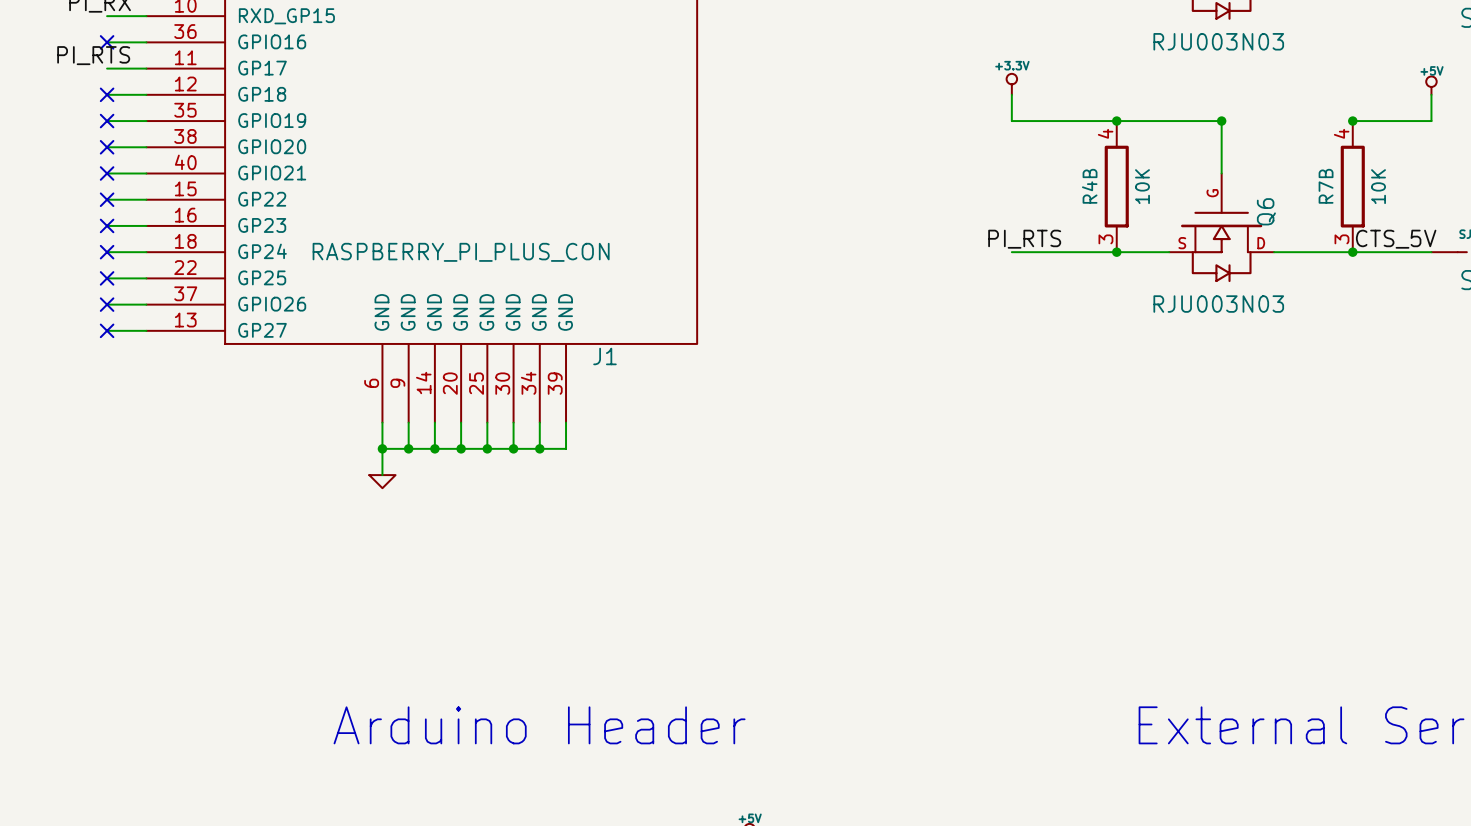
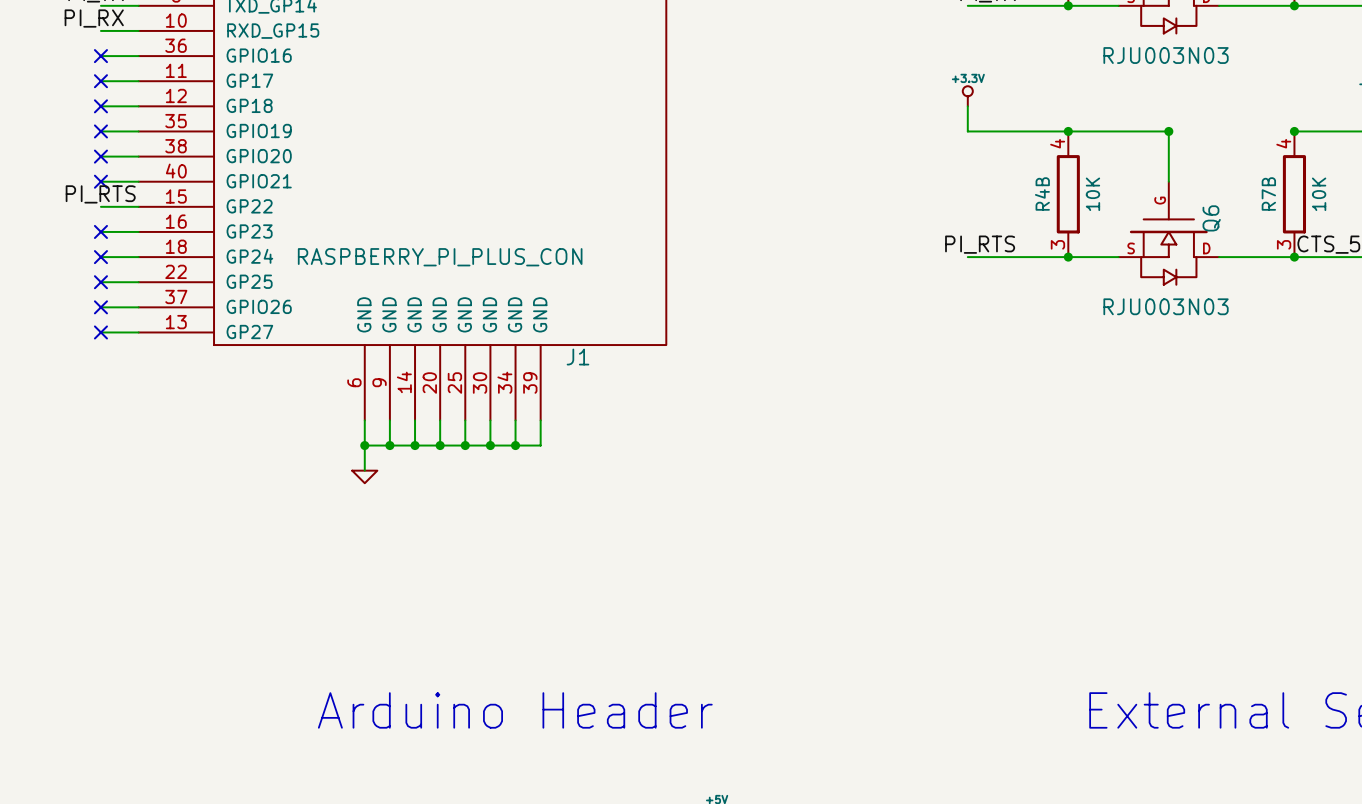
label position: PI_RTS (93, 55) -> PI_RTS (100, 194)
no-connect mark: none -> (100, 81)
no-connect mark: (107, 199) -> none

